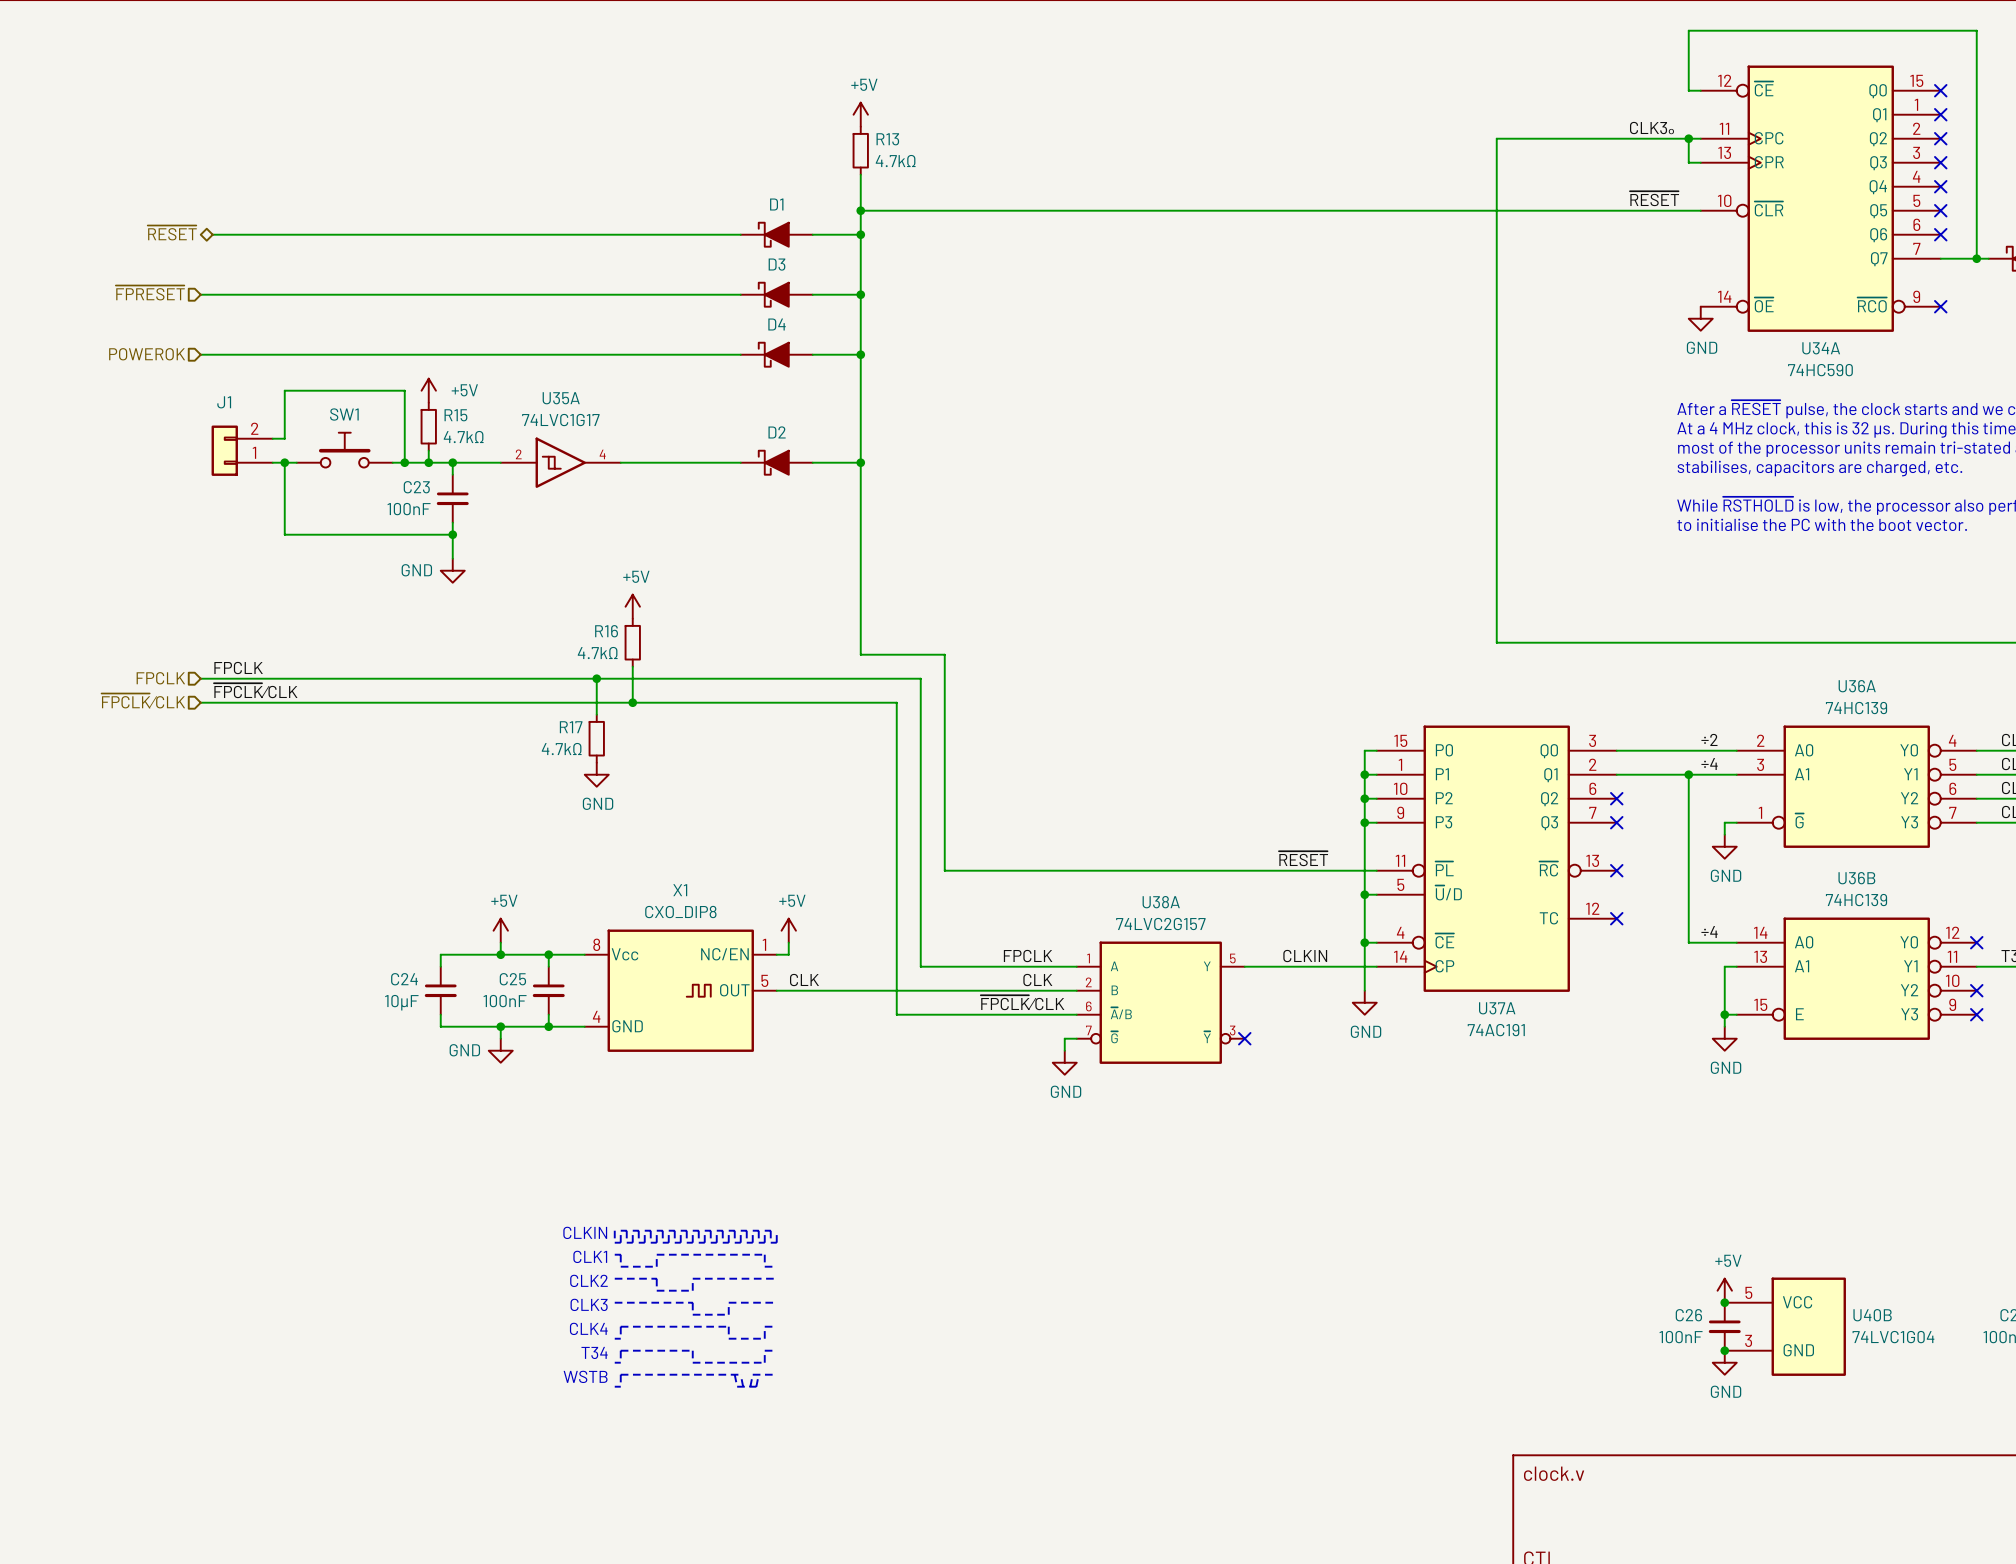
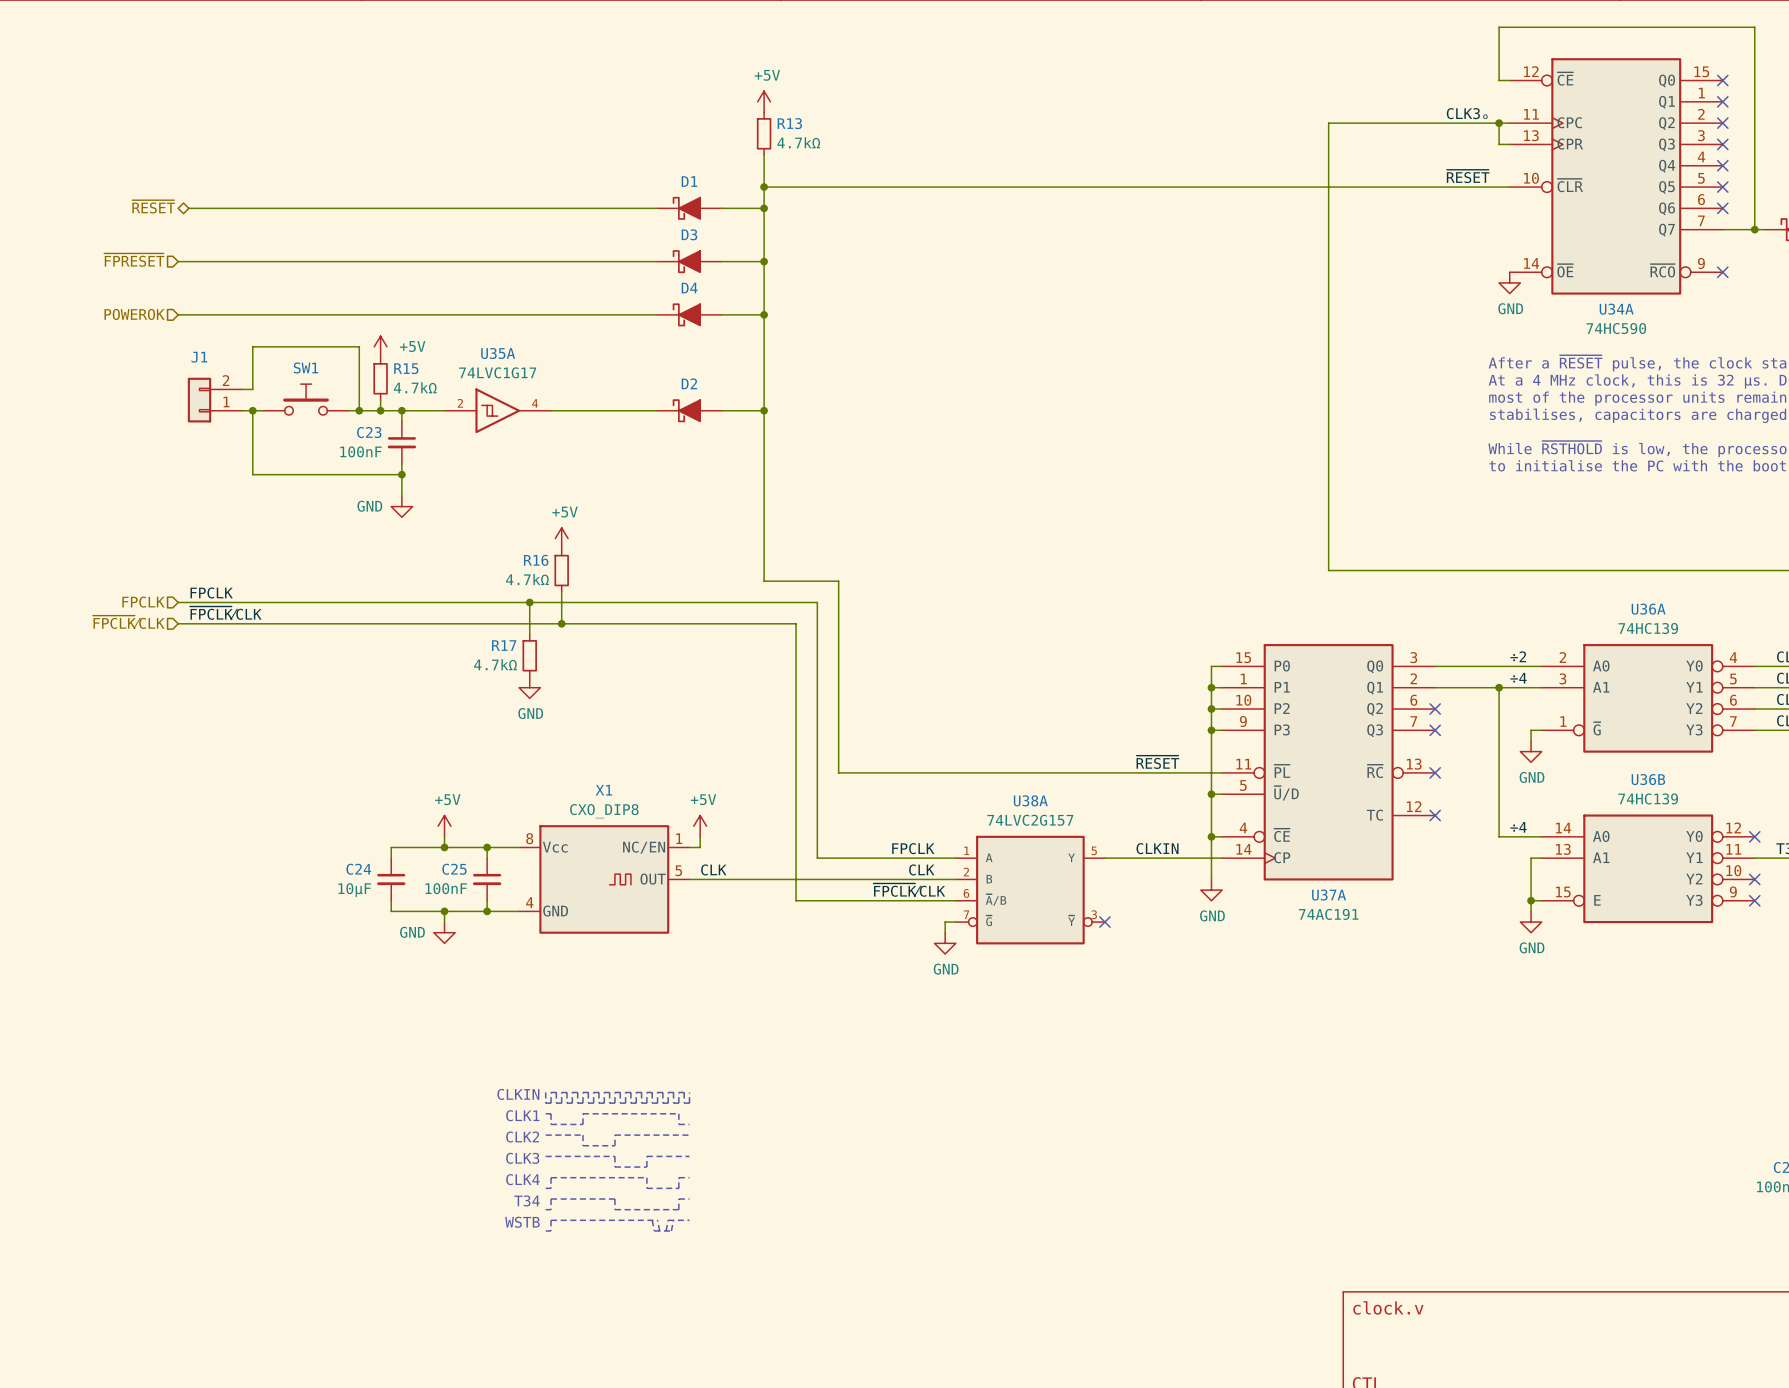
power symbol: +5V (1724, 1290) -> none
junction: (1724, 1302) -> none
C26: 100nF (1724, 1326) -> none
U40B: 74LVC1G04 (1785, 1326) -> none
junction: (1724, 1350) -> none
power symbol: GND (1724, 1362) -> none

